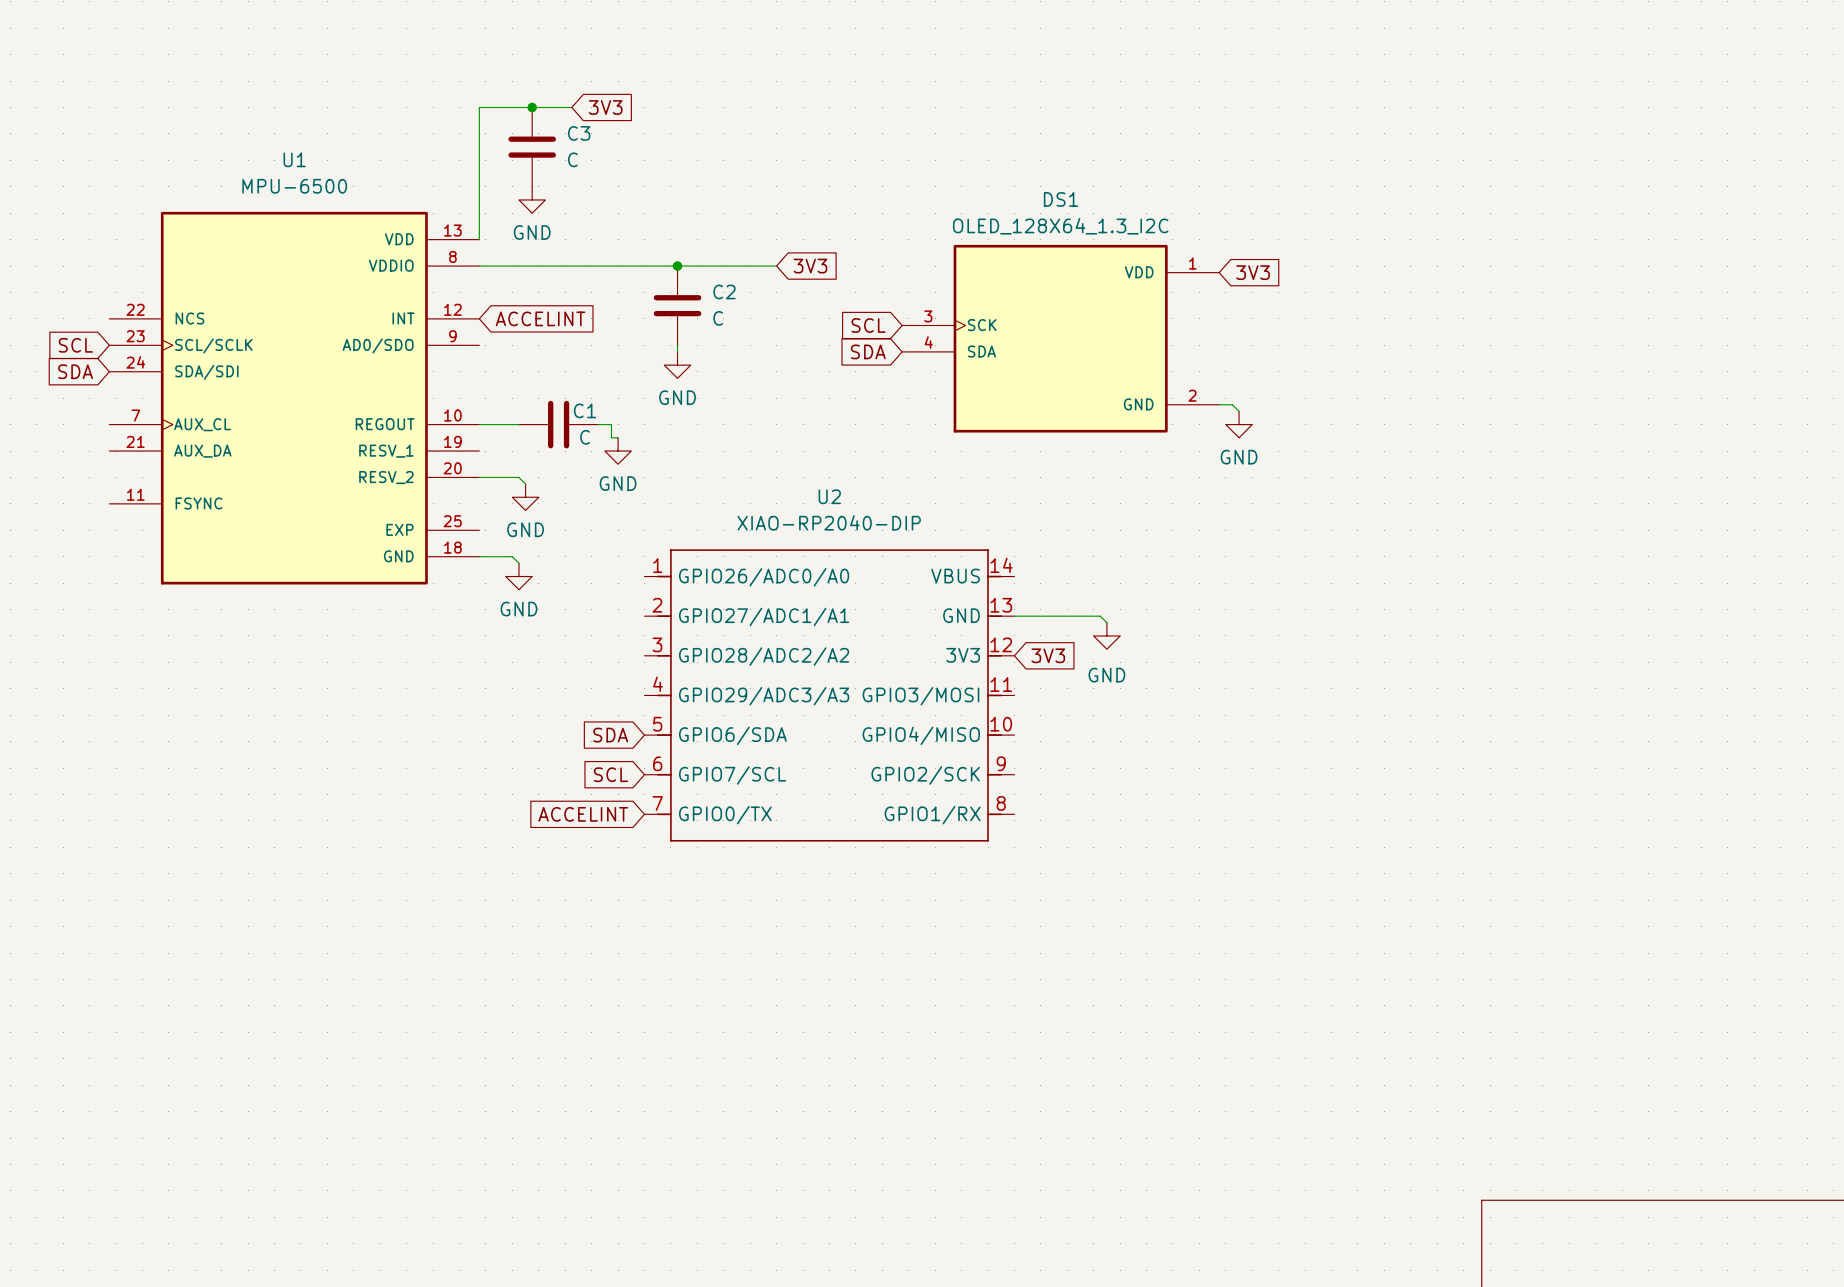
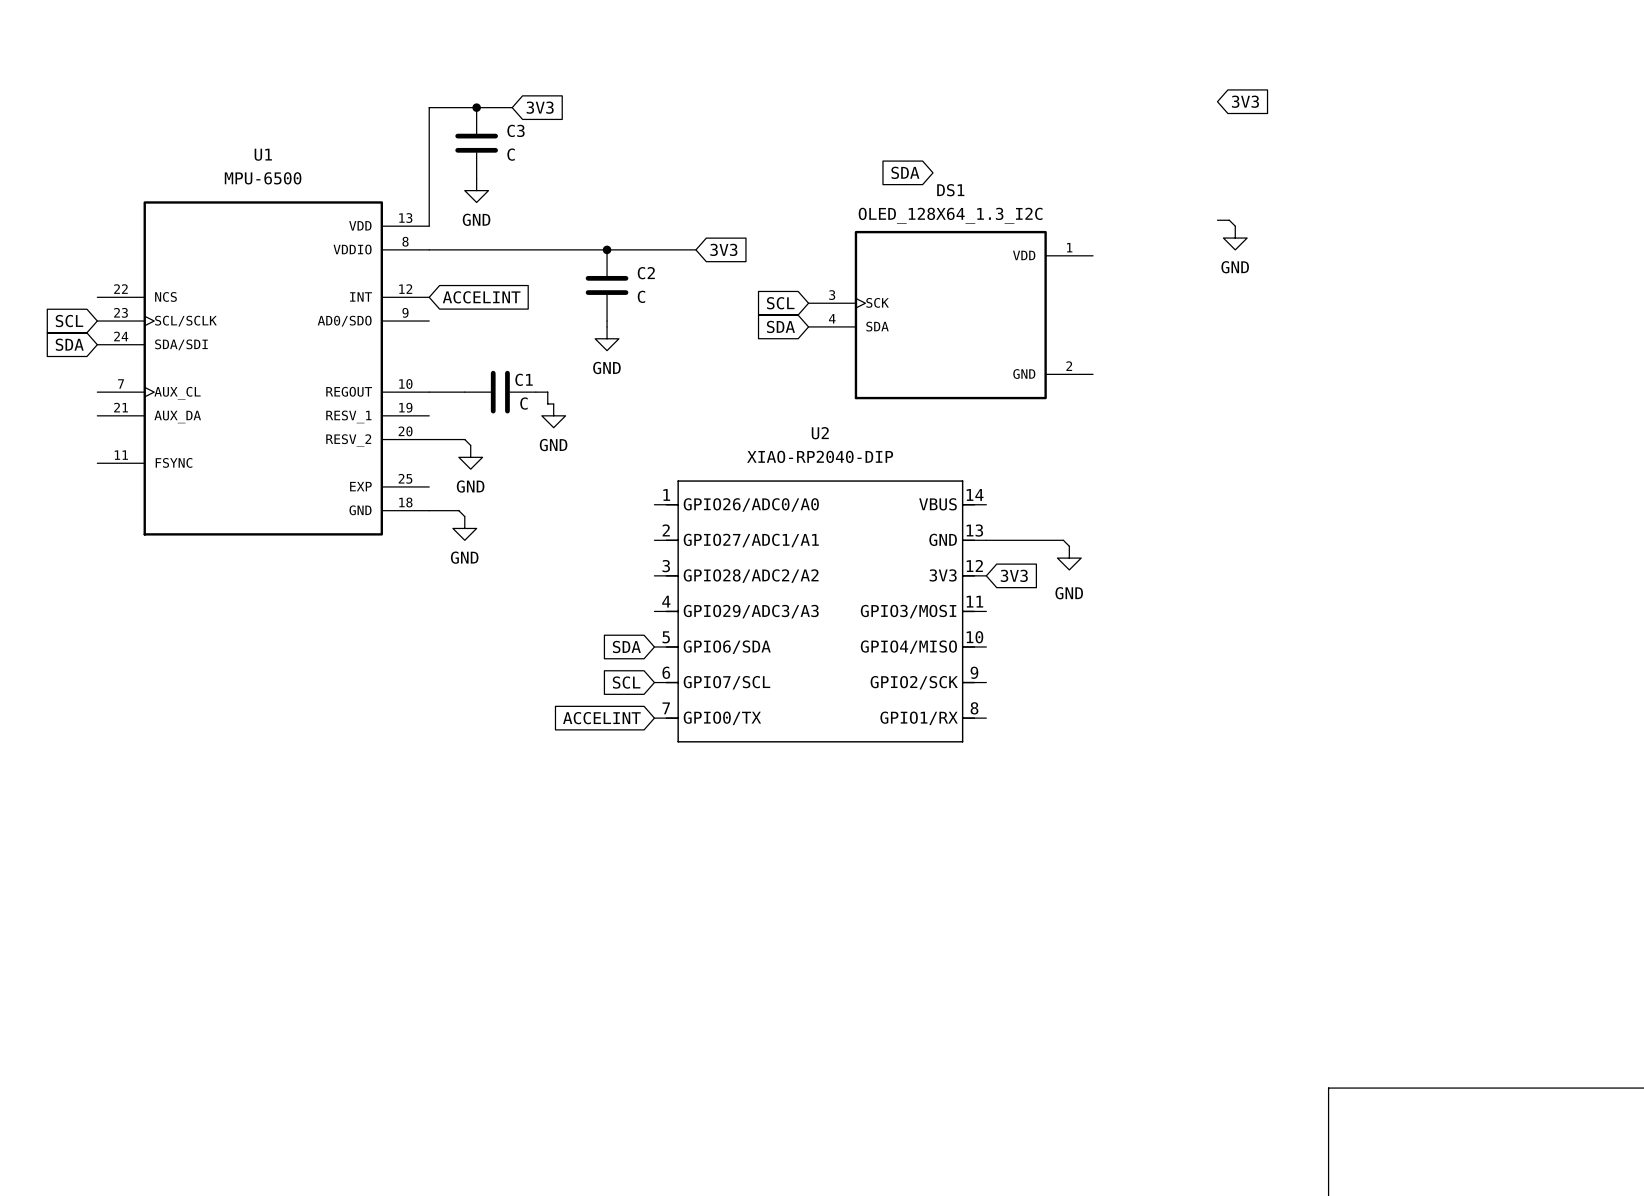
global label: none -> 3V3 (1245, 101)
global label: none -> SDA (905, 172)
power symbol: none -> GND (1235, 238)
global label: 3V3 (1253, 272) -> none
wire: (1219, 404) (1232, 404) (1239, 411) -> (1217, 220) (1229, 220) (1235, 226)
power symbol: GND (1239, 424) -> none
wire: (1014, 616) (1100, 616) (1106, 622) -> (986, 540) (1063, 540) (1069, 546)
power symbol position: GND (1106, 635) -> GND (1069, 558)
global label position: 3V3 (1048, 655) -> 3V3 (1014, 575)
U2 position: (829, 695) -> (820, 611)
global label position: SDA (610, 735) -> SDA (626, 647)
global label position: SCL (610, 774) -> SCL (626, 682)
global label position: ACCELINT (583, 814) -> ACCELINT (601, 718)

